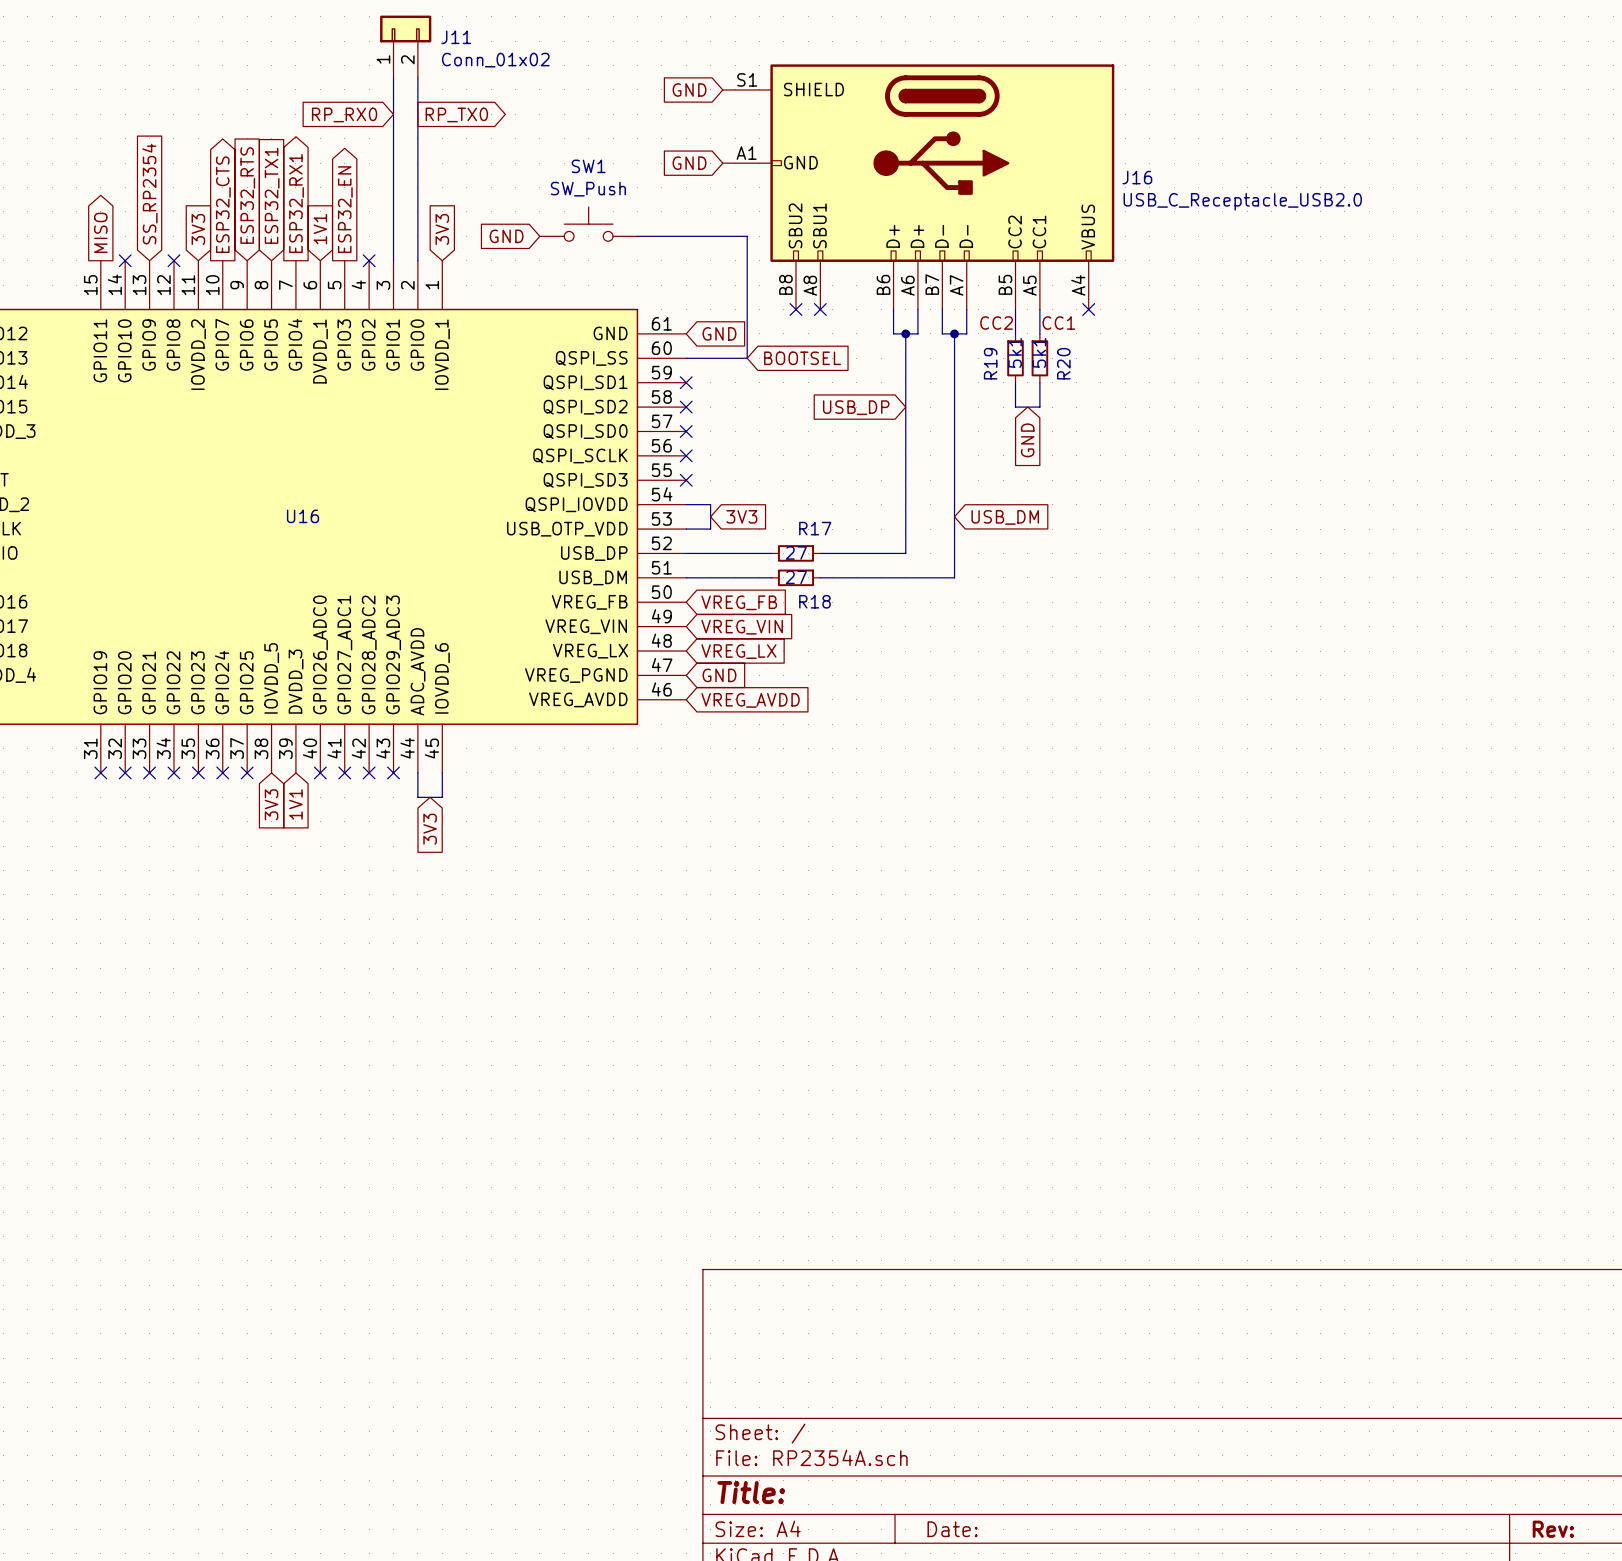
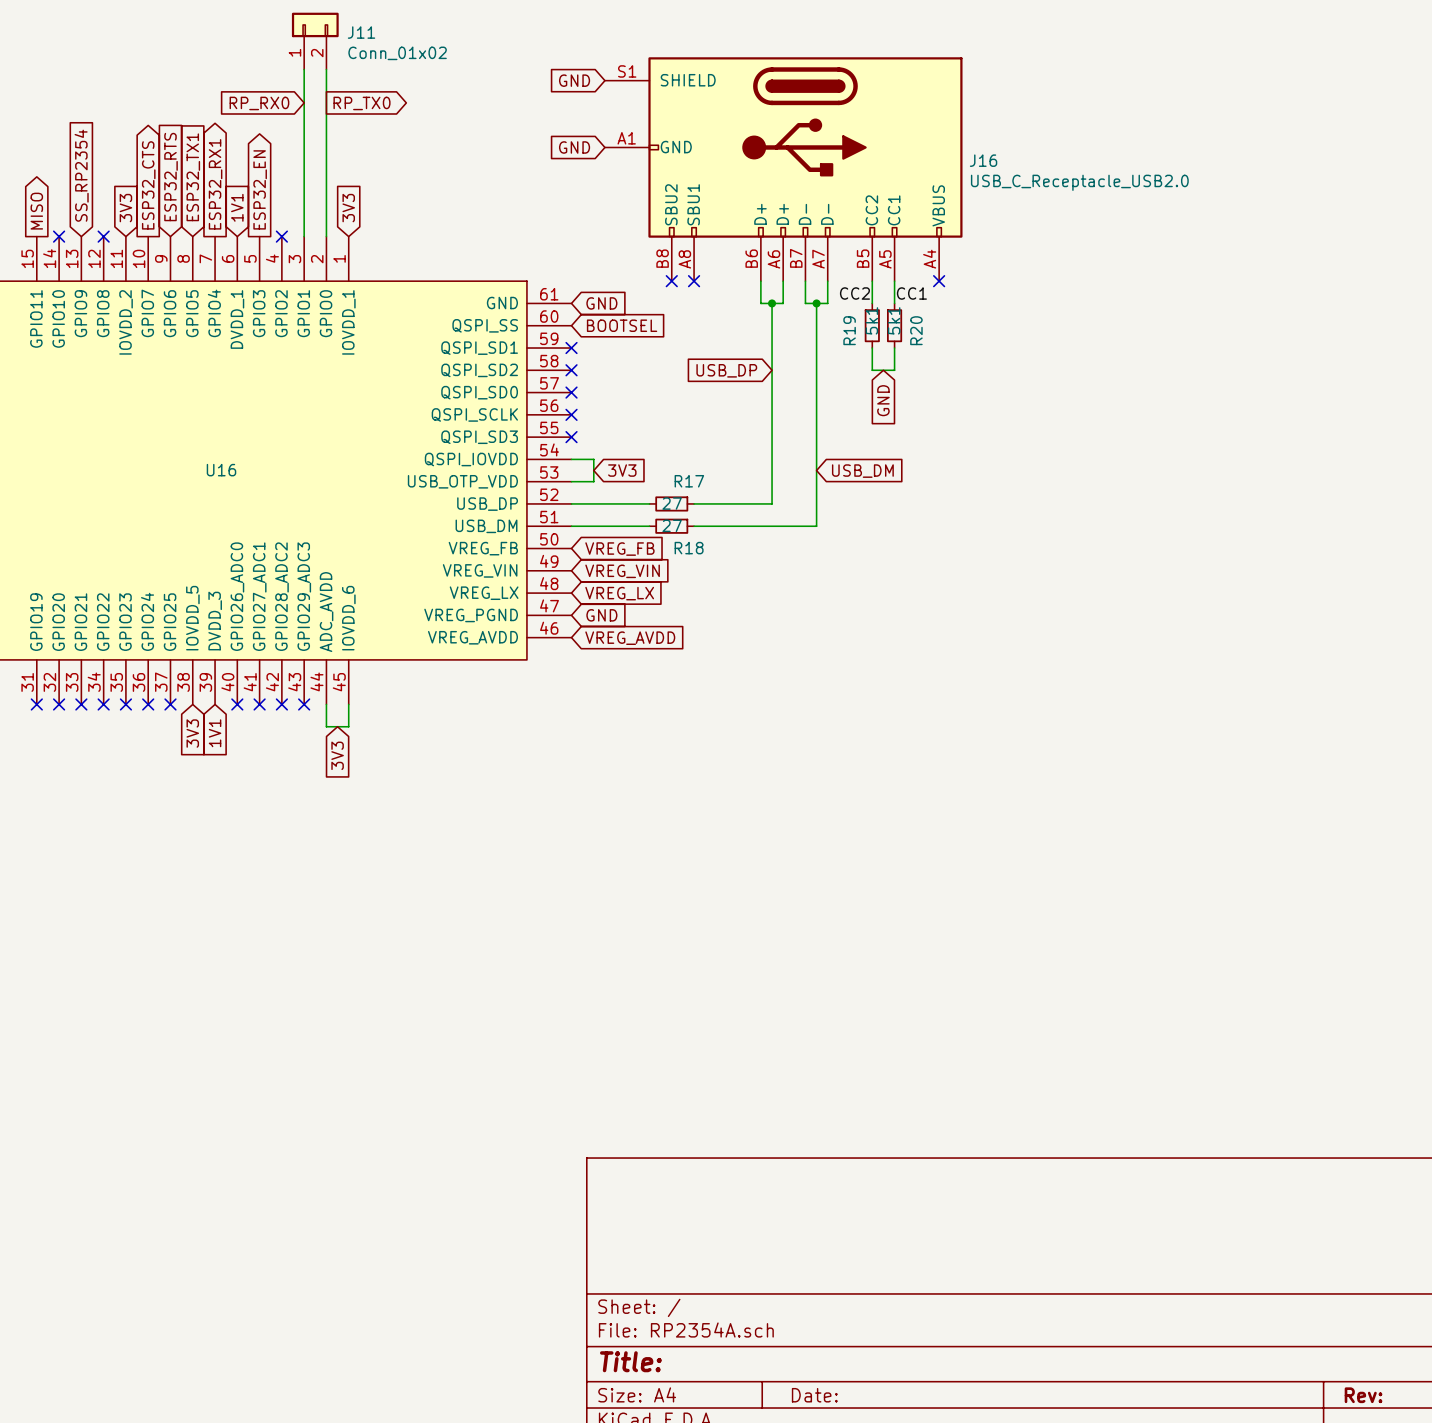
SW1: SW_Push (588, 224) -> none
global label: GND (506, 236) -> none
wire: (637, 236) (747, 236) (747, 358) (686, 358) -> none
global label position: BOOTSEL (802, 358) -> BOOTSEL (622, 325)

